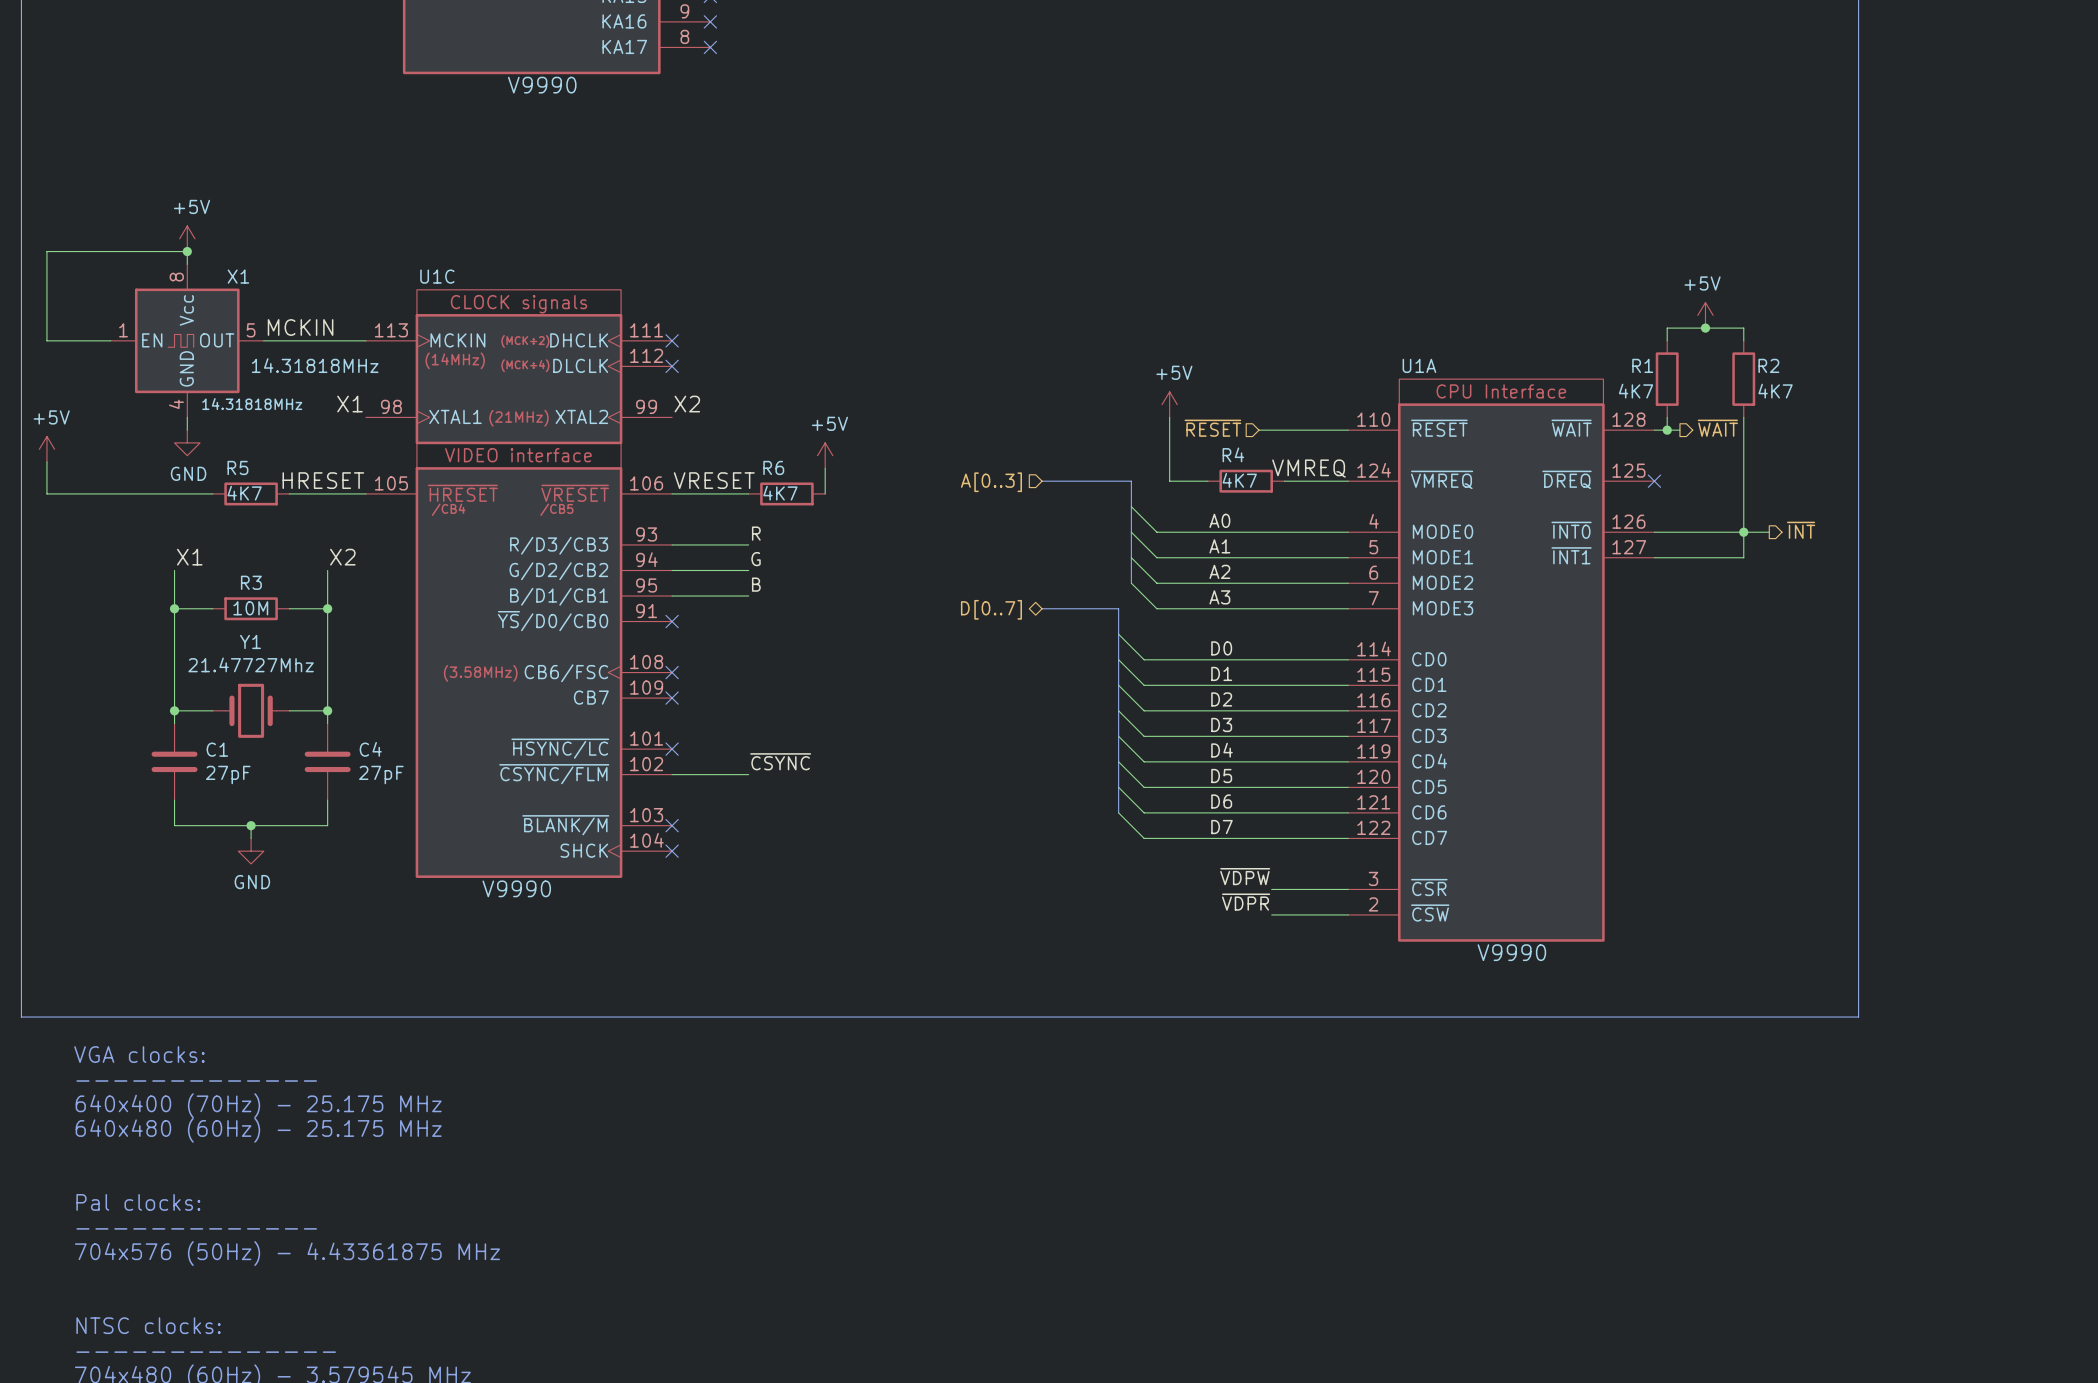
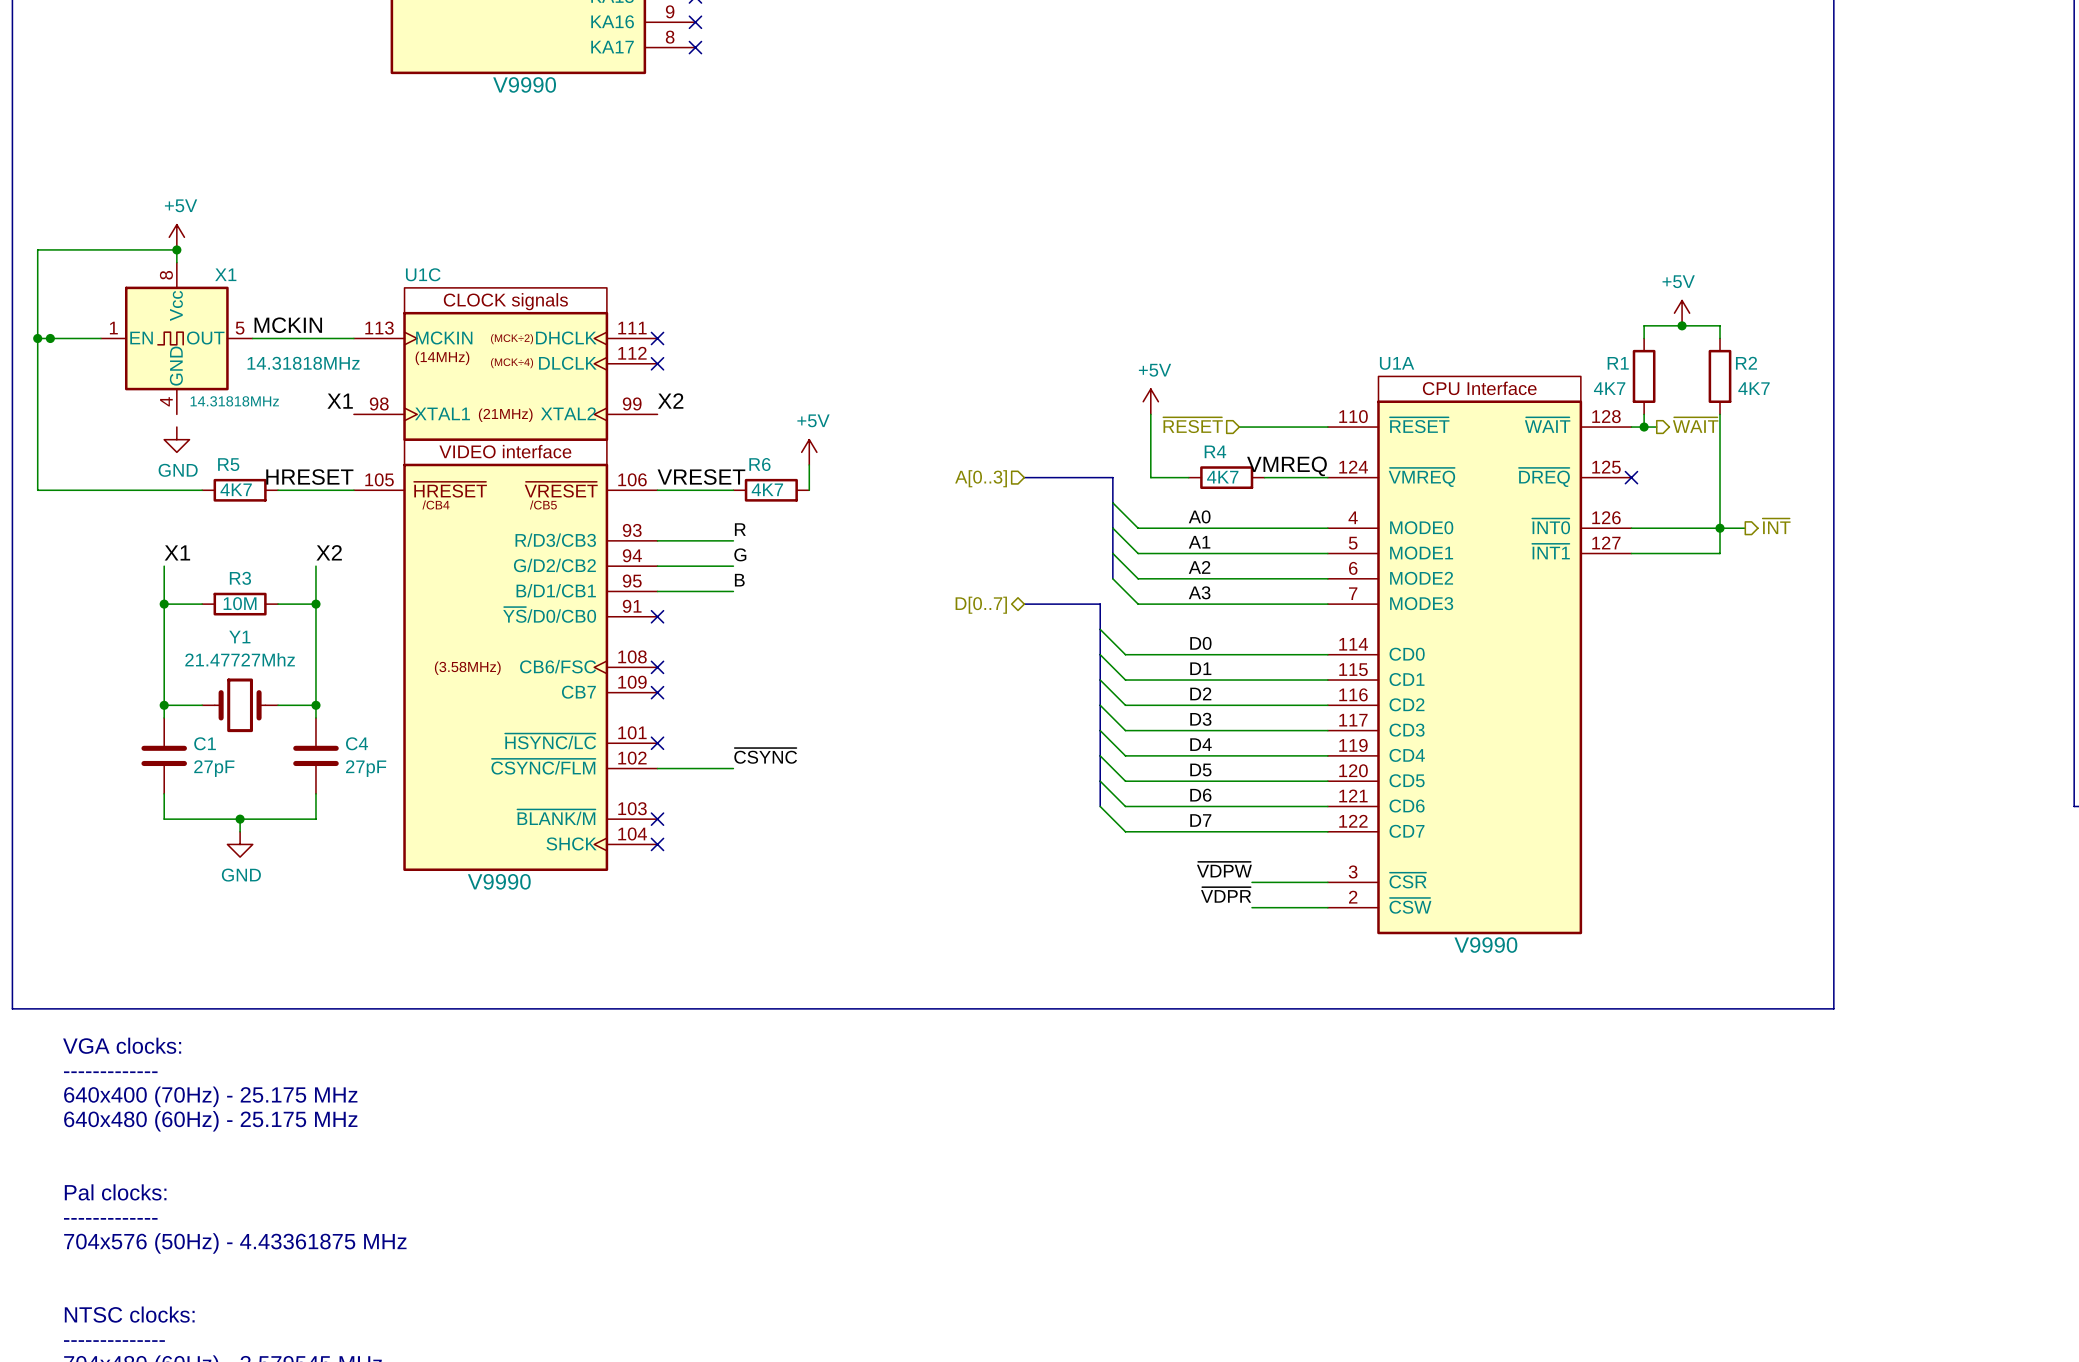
wire: none -> (37, 338) (37, 458)
junction: none -> (37, 338)
junction: none -> (50, 338)
wire: (187, 417) (187, 430) -> none
power symbol: +5V (46, 449) -> none

